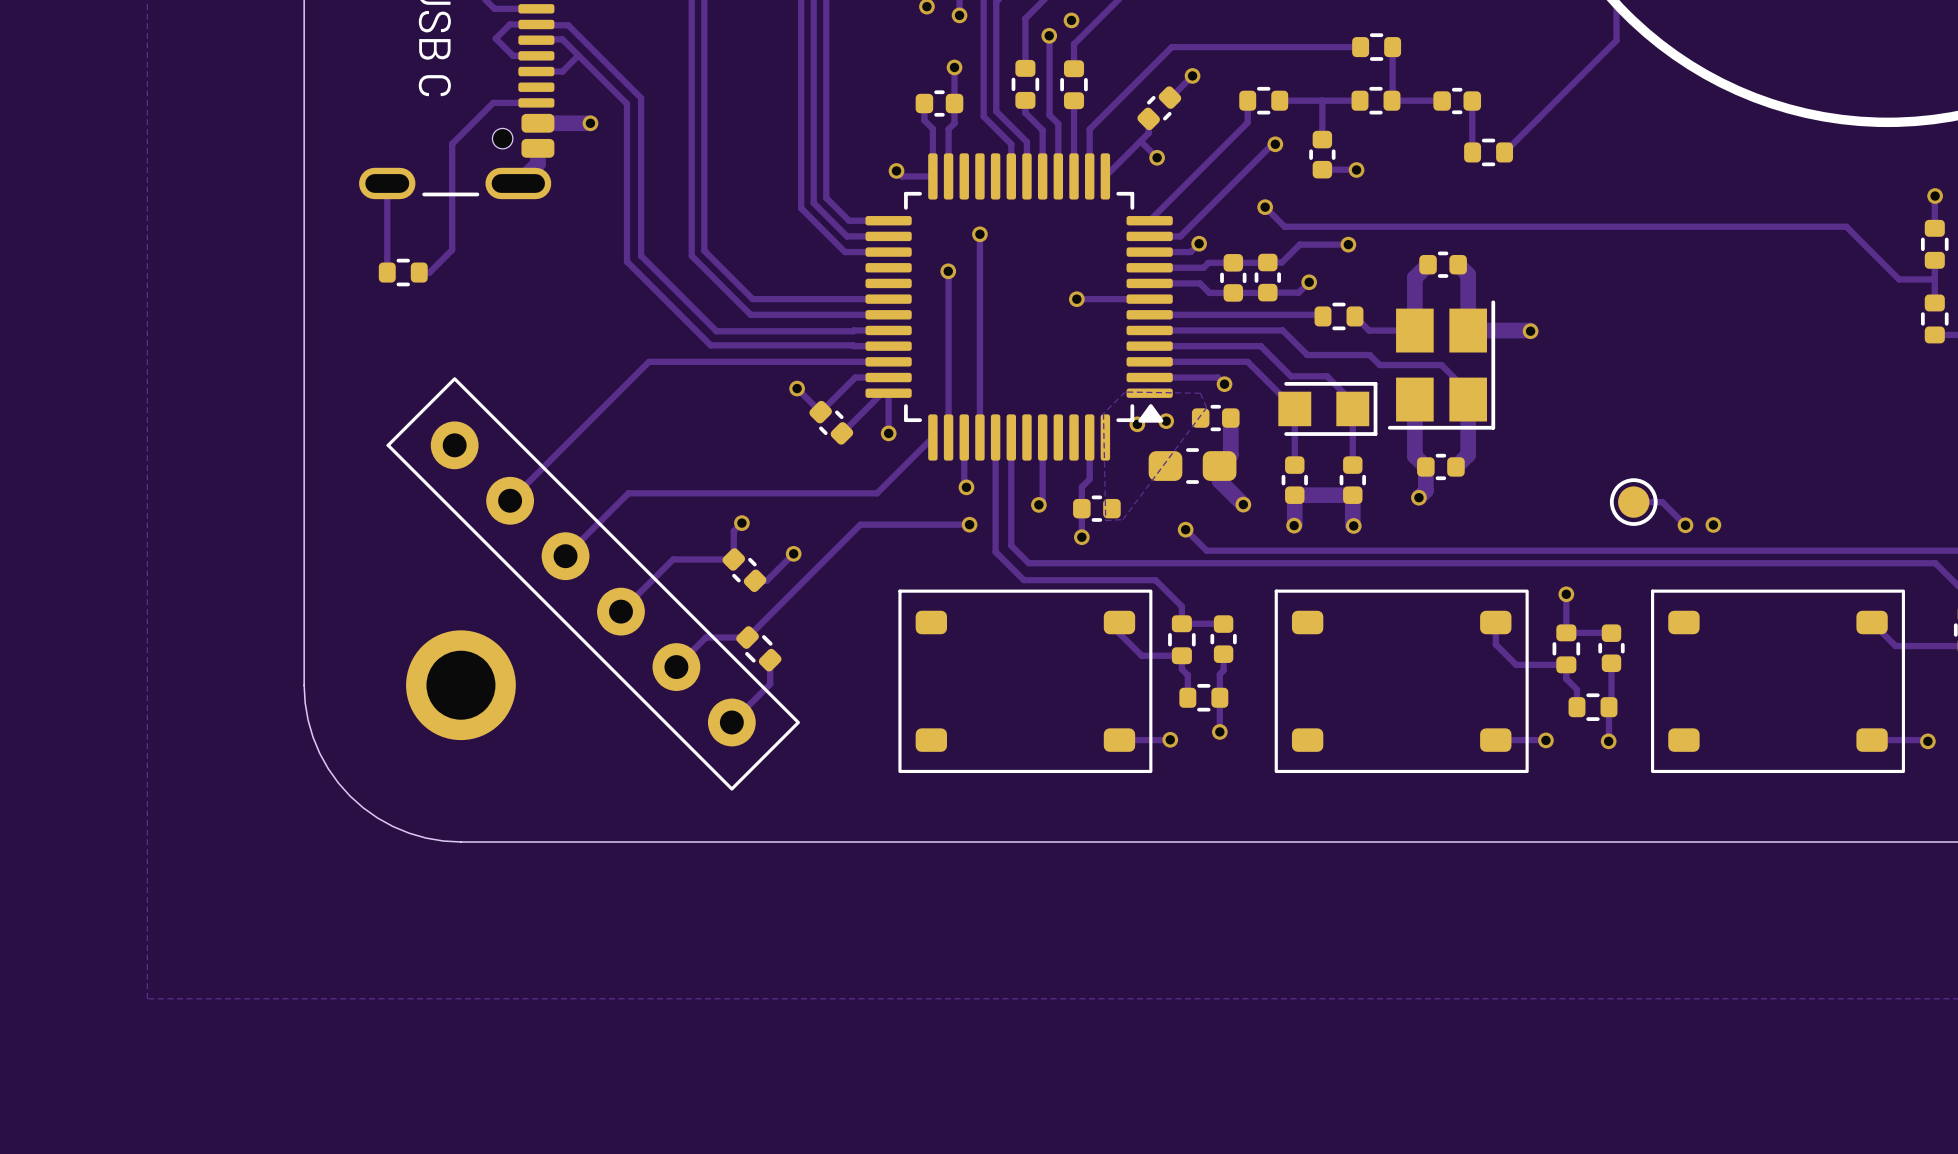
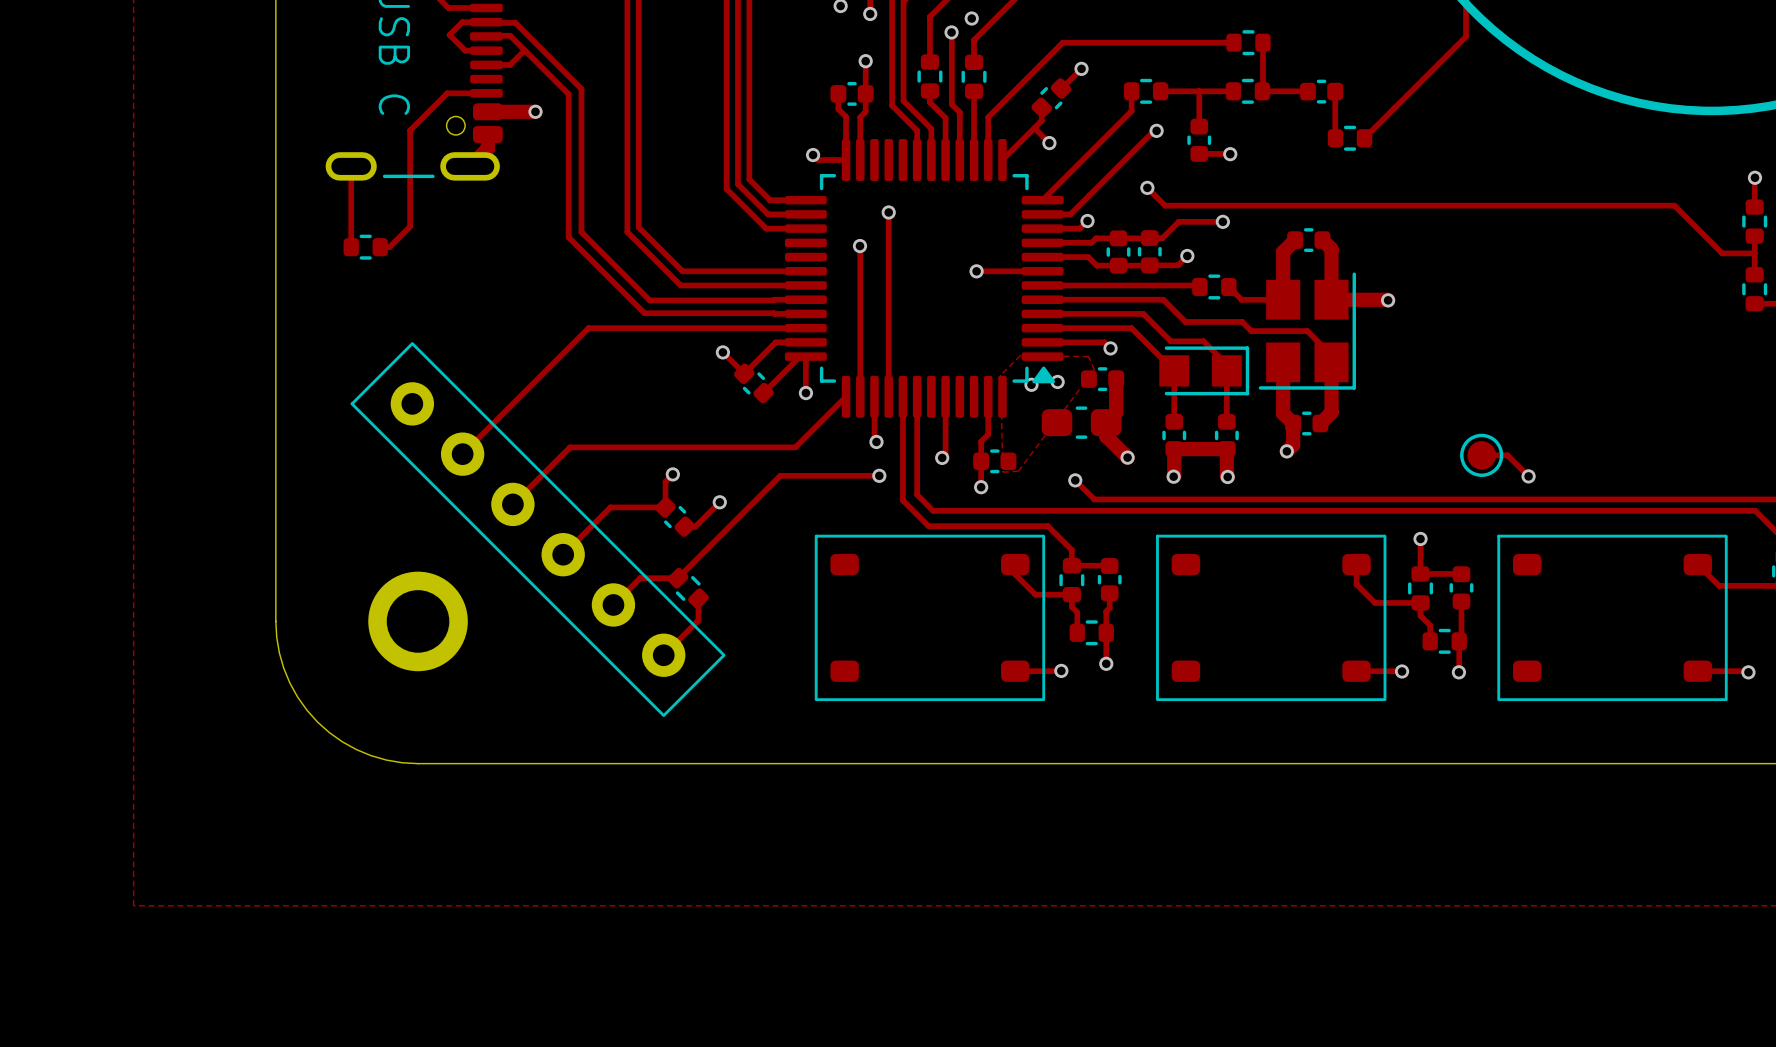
via: (1713, 524) -> none

